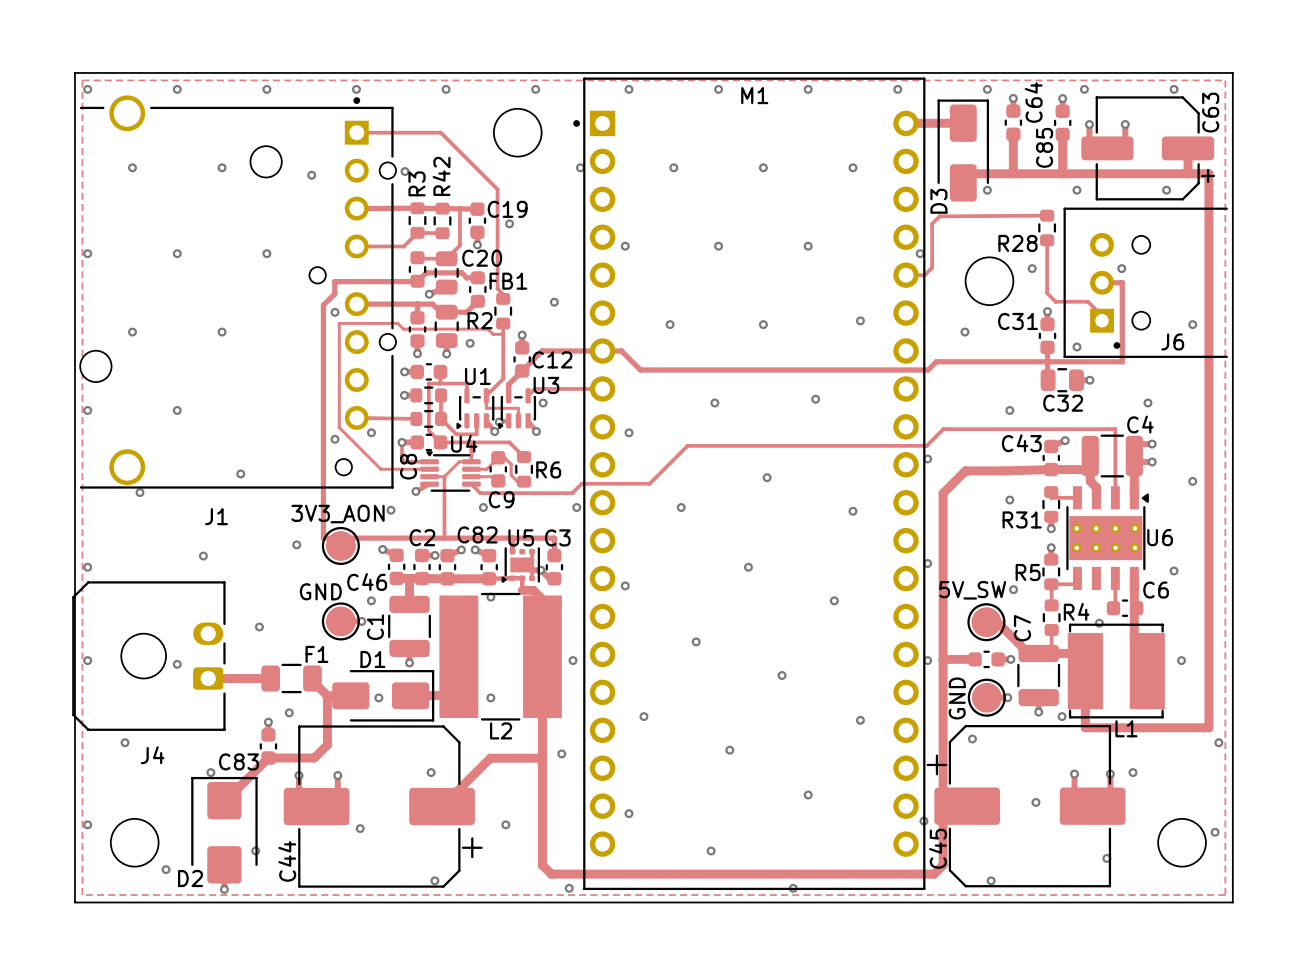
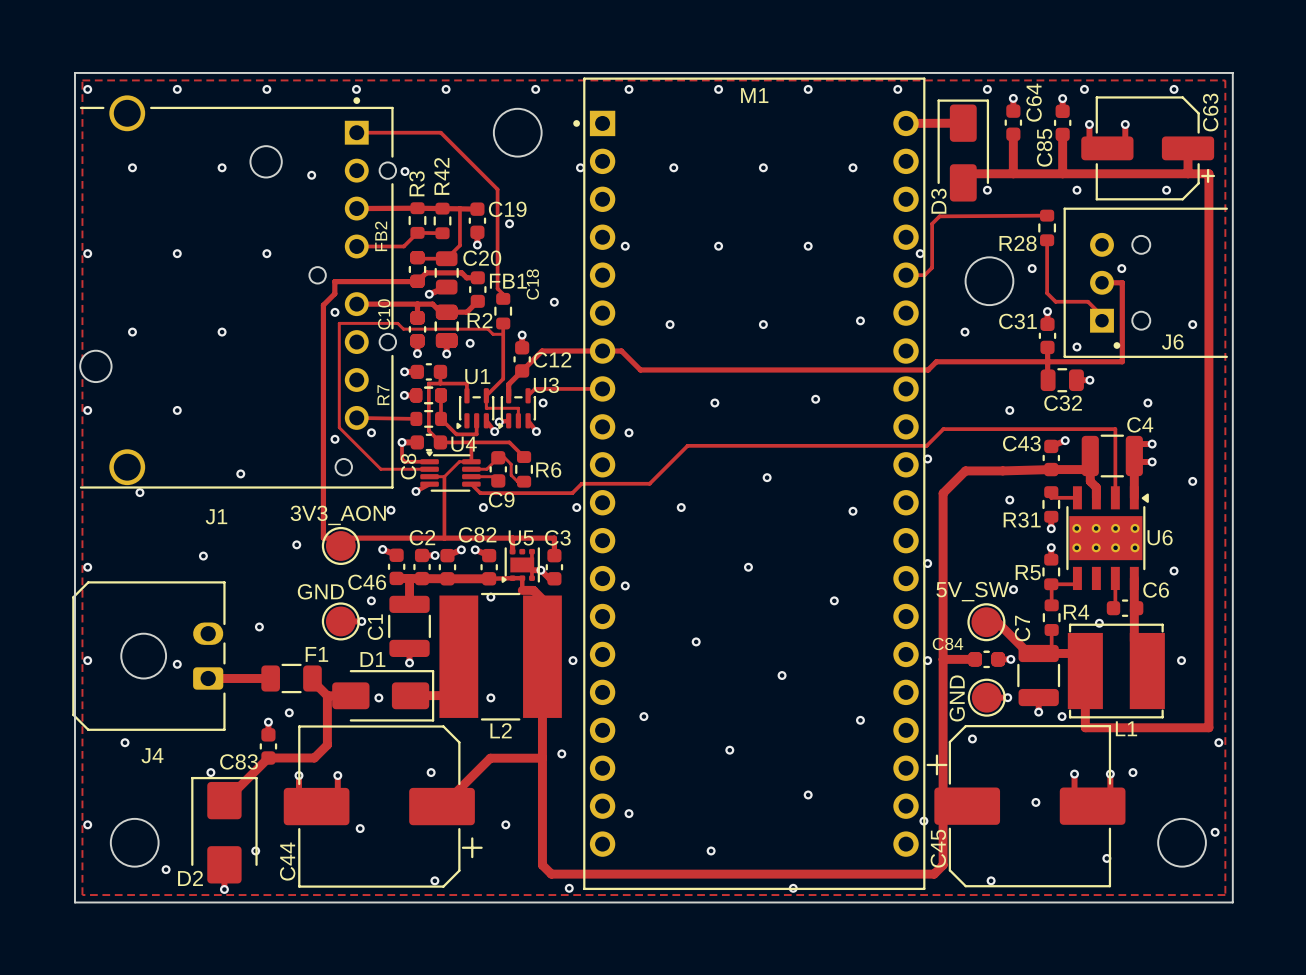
FB2: none -> (417, 269)
C18: none -> (446, 326)
C10: none -> (417, 329)
R7: none -> (428, 395)
C84: none -> (986, 659)

